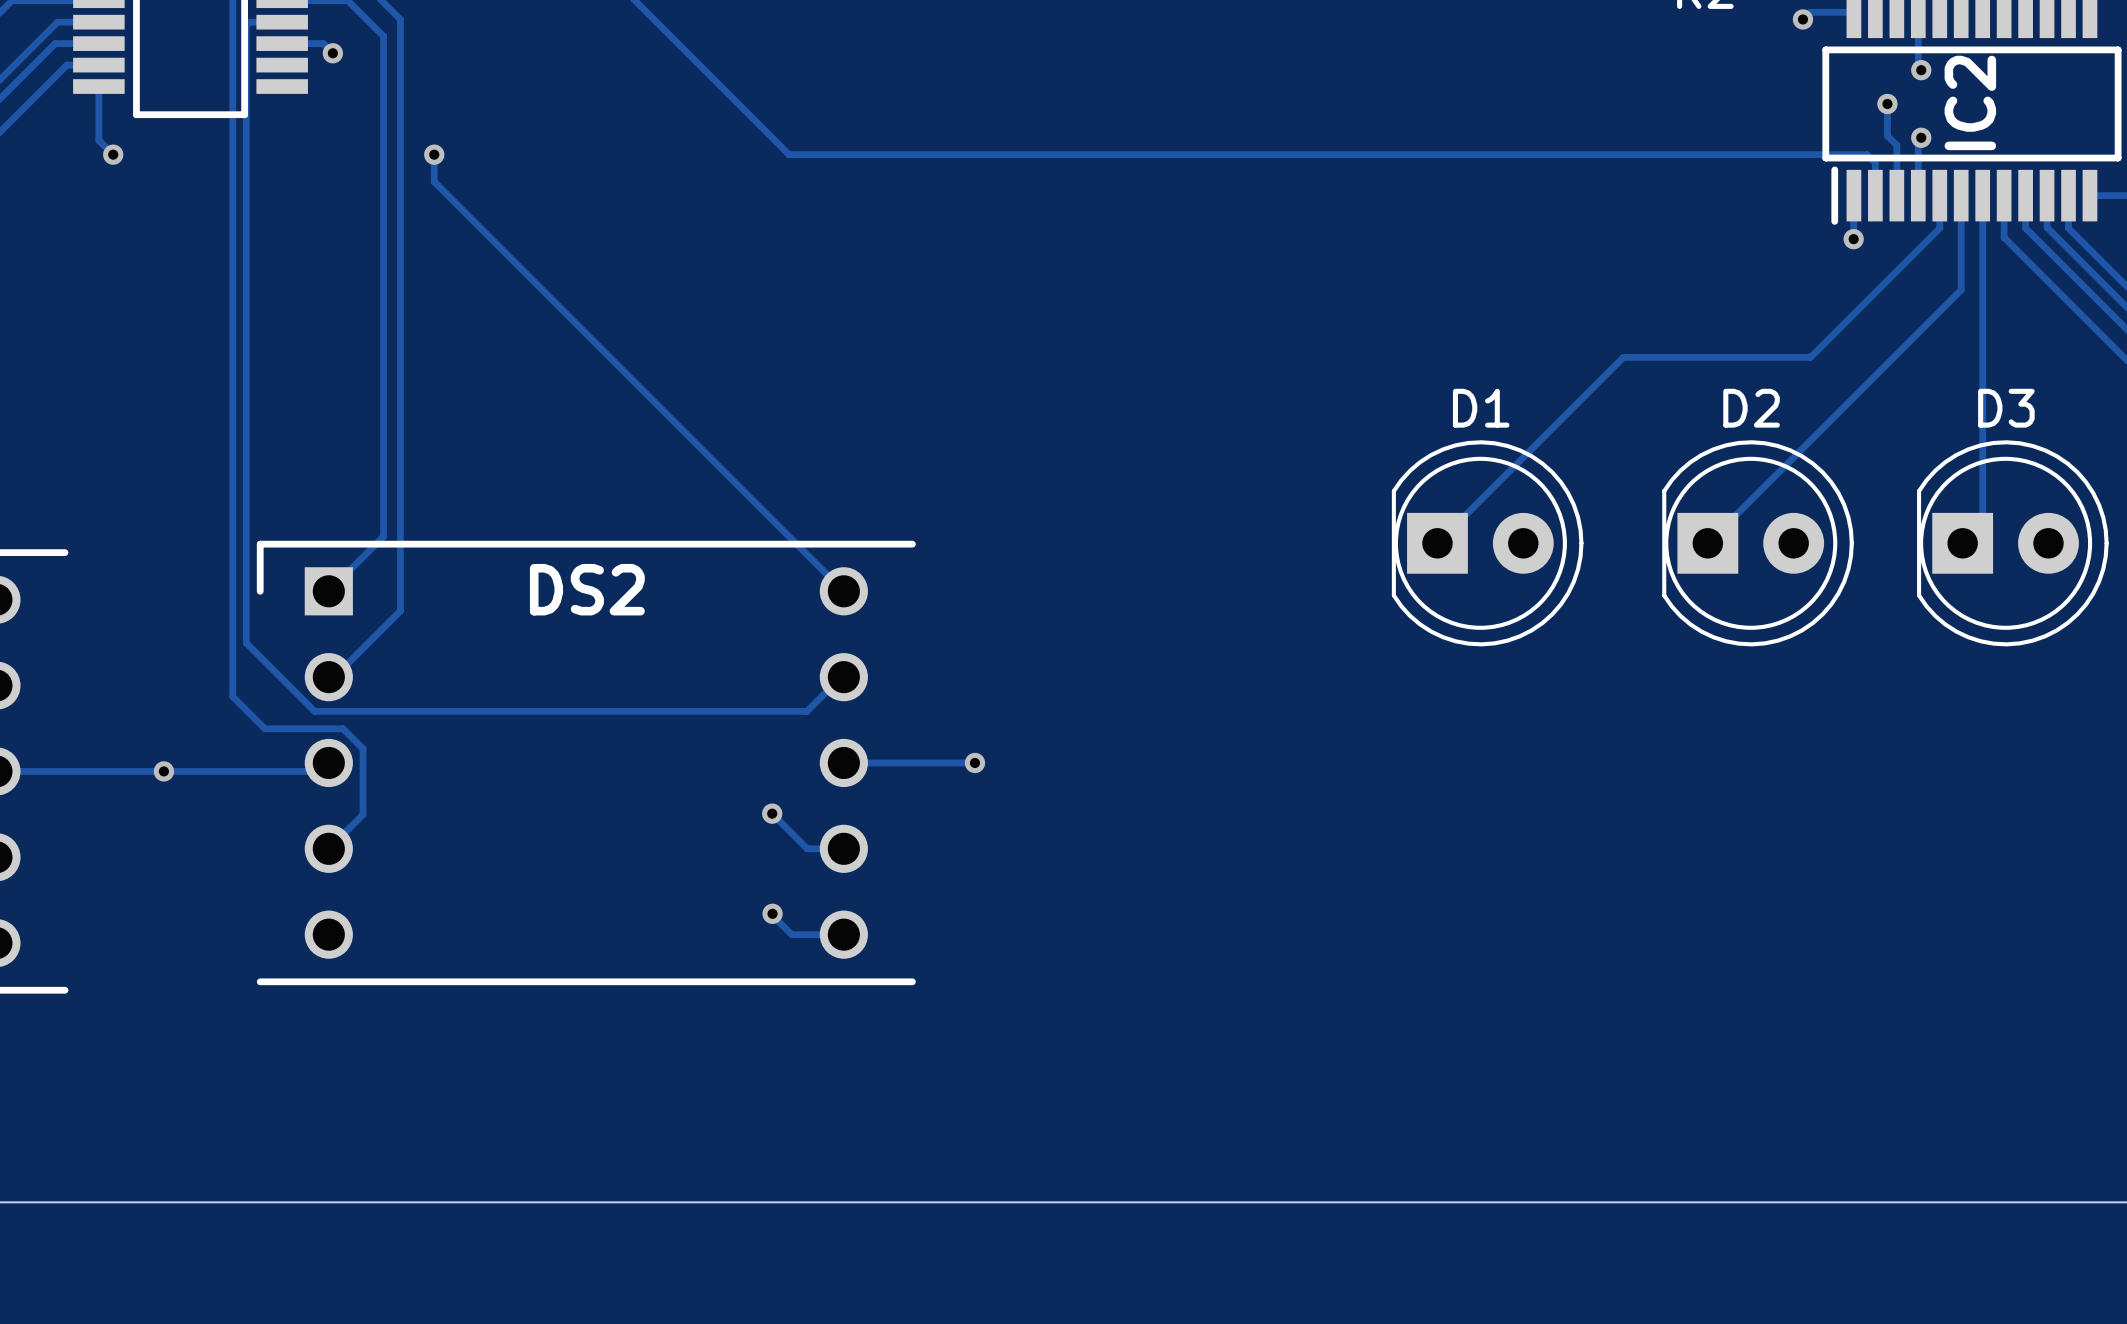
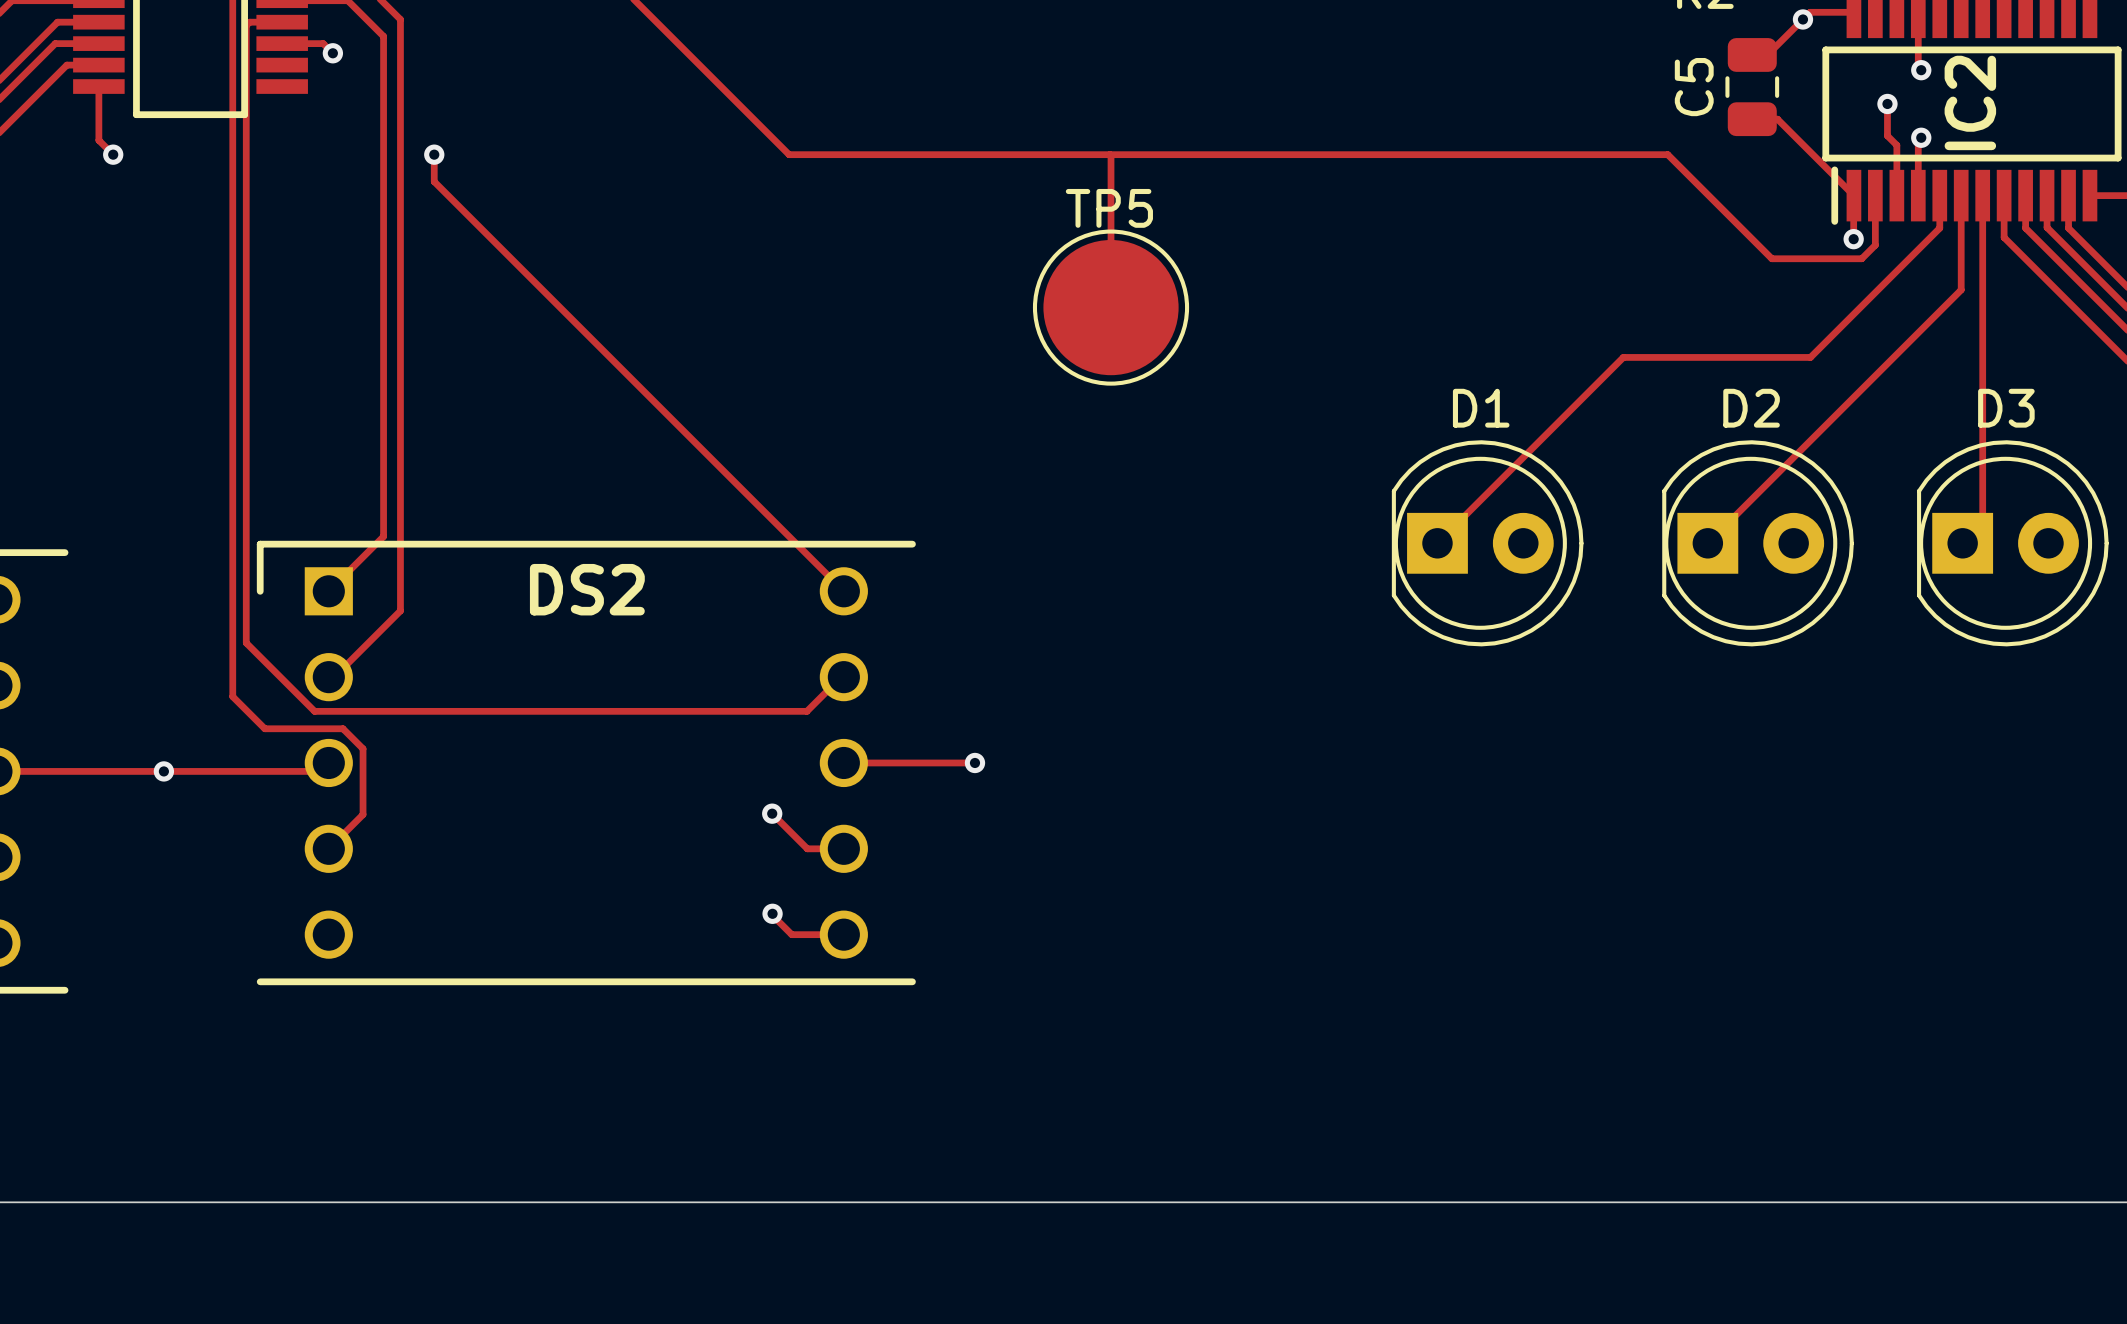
track: none -> (1802, 19) (1767, 54) (1752, 54)
C5: none -> (1752, 87)
track: none -> (1752, 119) (1777, 119) (1853, 195)
track: none -> (1110, 154) (1111, 307)
track: (1667, 154) (1866, 154) (1875, 163) (1875, 195) -> (1667, 154) (1771, 258) (1861, 258) (1875, 245) (1875, 195)
TP5: none -> (1111, 307)

